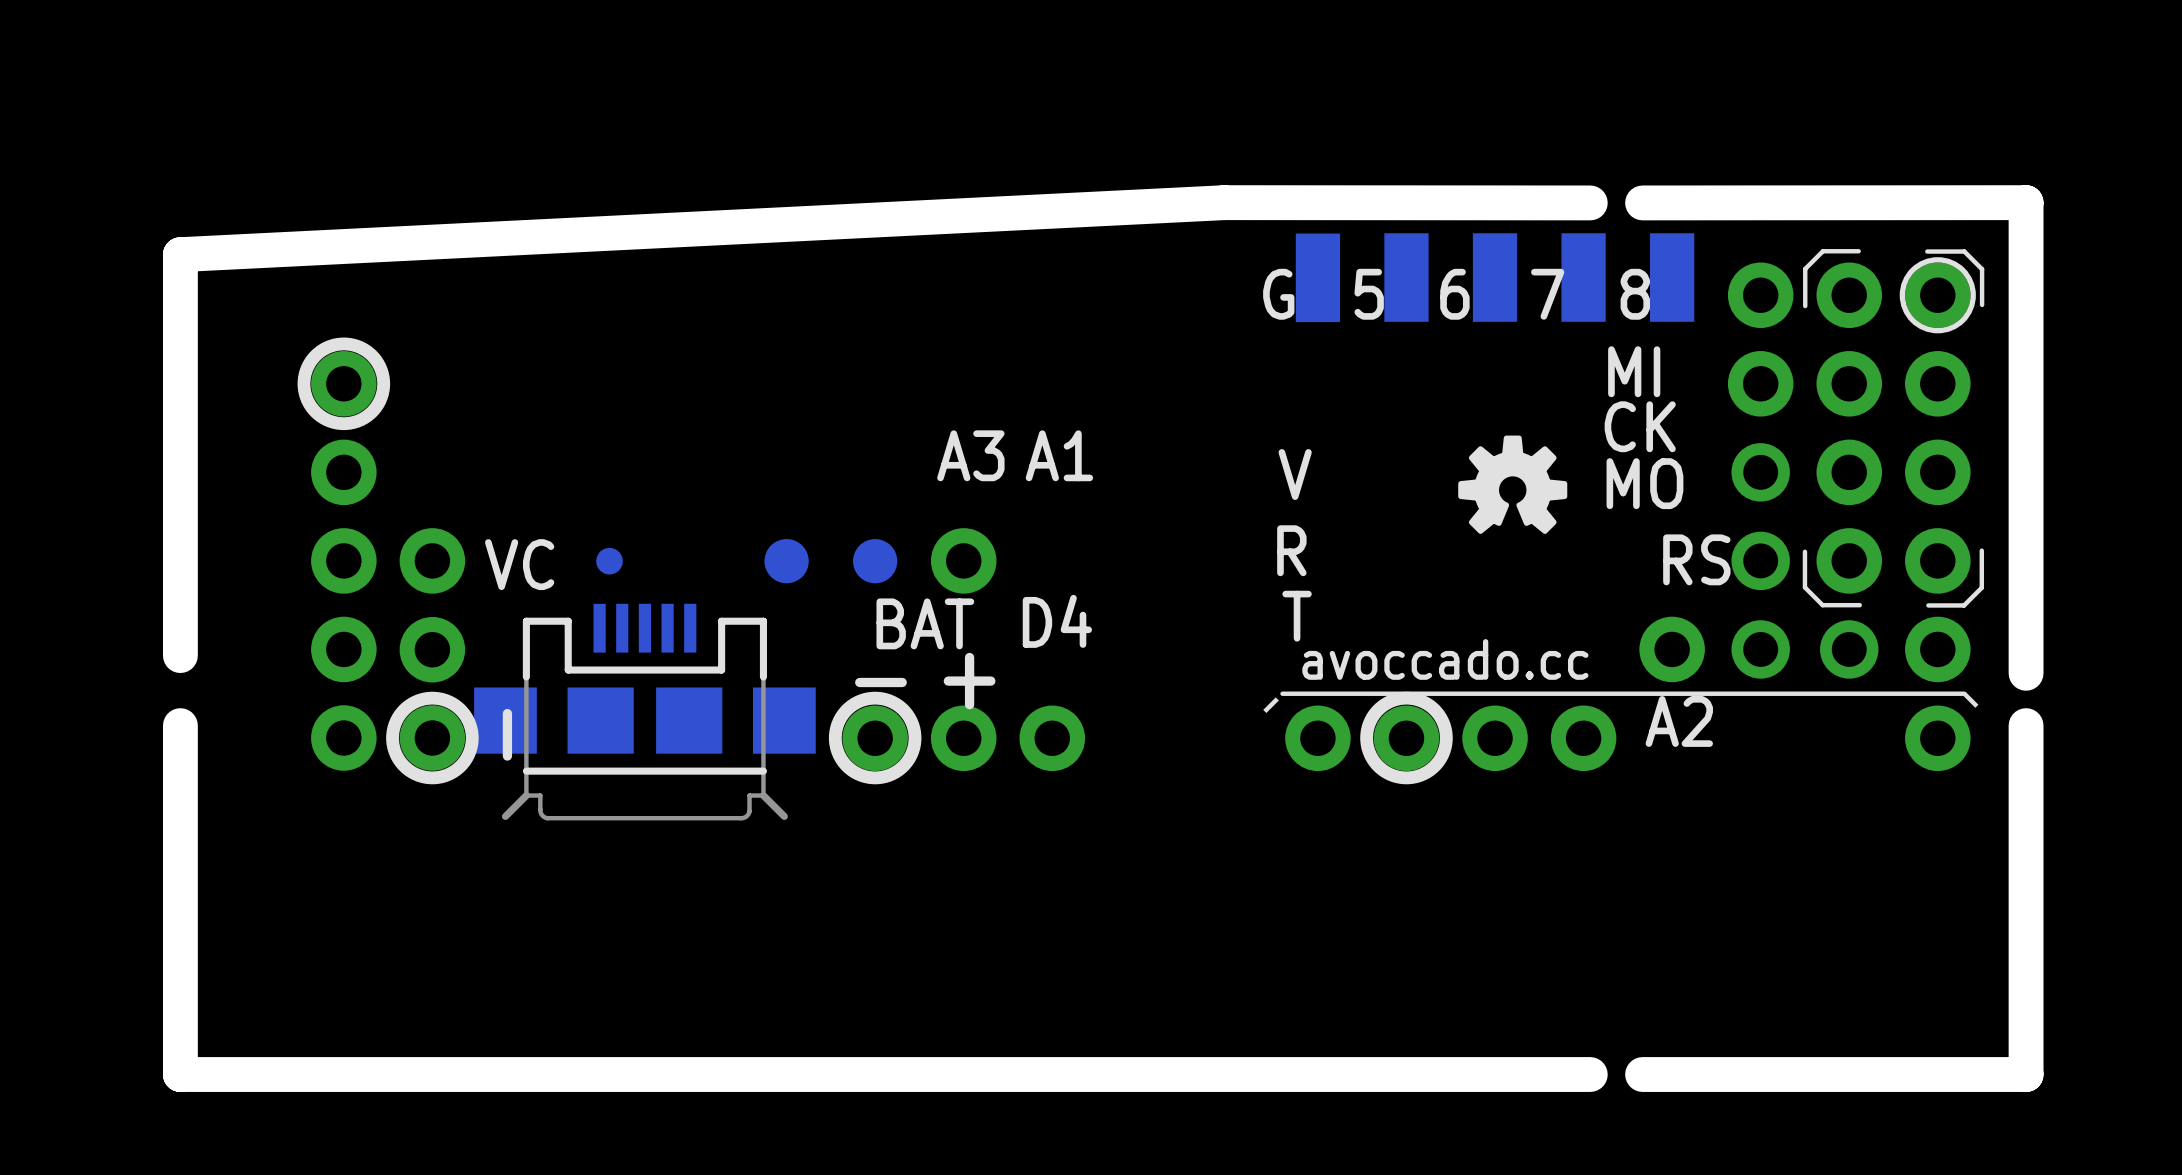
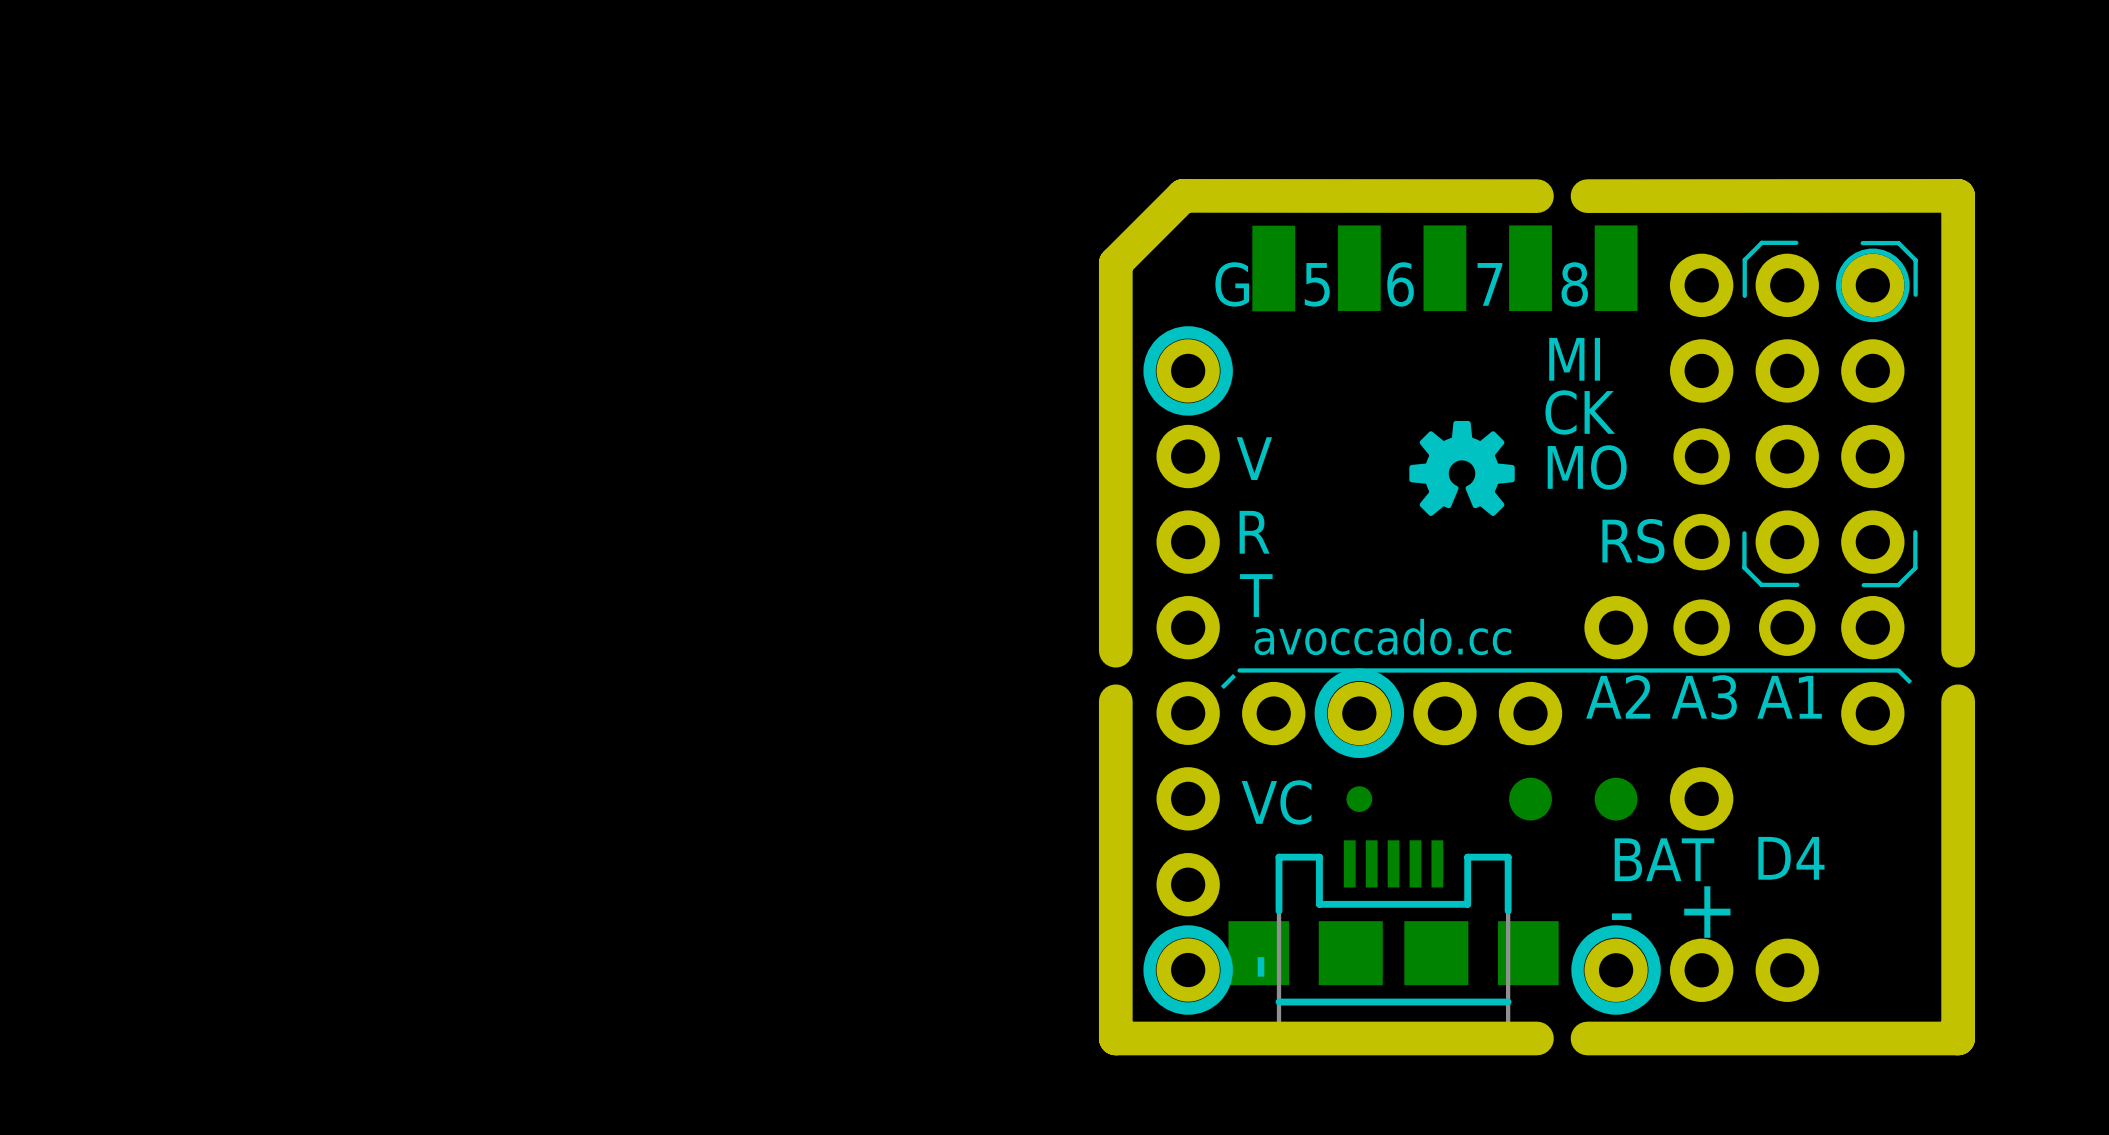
board edge: (1224, 202) (180, 254) (180, 655) -> (1183, 195) (1115, 263) (1115, 650)
drawing: [297, 337, 391, 431] -> none
drawing: none -> [1143, 326, 1233, 416]
part: (343, 383) -> none
part: none -> (1188, 370)
text position: A3 (970, 455) -> A3 (1704, 697)
text position: A1 (1059, 455) -> A1 (1789, 697)
part: (343, 472) -> none
part: none -> (1188, 456)
part: (343, 560) -> none
part: (432, 560) -> none
part: (963, 560) -> none
part: none -> (1188, 542)
part position: (609, 561) -> (1359, 799)
part: (786, 561) -> none
part: (875, 561) -> none
text position: VC (519, 564) -> VC (1276, 802)
text position: D4 (1057, 621) -> D4 (1791, 858)
text position: BAT (925, 623) -> BAT (1664, 859)
part: (343, 649) -> none
part: (432, 649) -> none
part: none -> (1188, 627)
text position: + (969, 681) -> + (1707, 912)
text: - (880, 682) -> none
drawing: [386, 691, 479, 785] -> none
drawing: [828, 691, 922, 785] -> none
part position: (644, 712) -> (1393, 944)
board edge: (180, 725) (180, 1074) (1154, 1074) -> (1115, 701) (1115, 1038)
text: - (507, 734) -> none
part: (343, 738) -> none
part: (432, 738) -> none
part: (875, 738) -> none
part: (963, 738) -> none
part: (1052, 738) -> none
part: none -> (1188, 713)
part: none -> (1188, 798)
part: none -> (1530, 799)
part: none -> (1616, 799)
part: none -> (1701, 798)
part: none -> (1188, 884)
text: none -> - (1621, 916)
drawing: none -> [1143, 925, 1233, 1015]
drawing: none -> [1571, 925, 1661, 1015]
text: none -> - (1260, 966)
part: none -> (1188, 970)
part: none -> (1616, 970)
part: none -> (1701, 970)
part: none -> (1787, 970)

